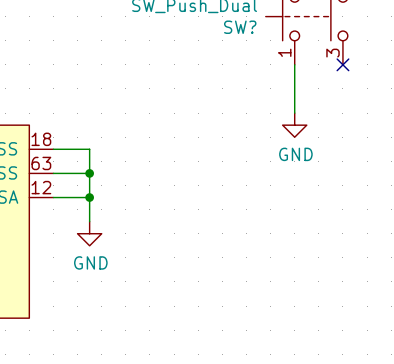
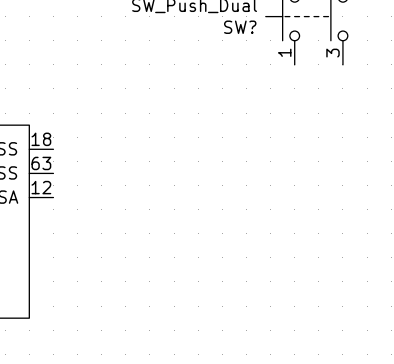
wire: (294, 64) (294, 113) -> none
no-connect mark: (342, 64) -> none
power symbol: GND (294, 125) -> none
wire: (53, 149) (89, 149) (89, 221) -> none
wire: (53, 173) (89, 173) -> none
junction: (89, 173) -> none
wire: (53, 197) (89, 197) -> none
junction: (89, 197) -> none
power symbol: GND (89, 233) -> none

